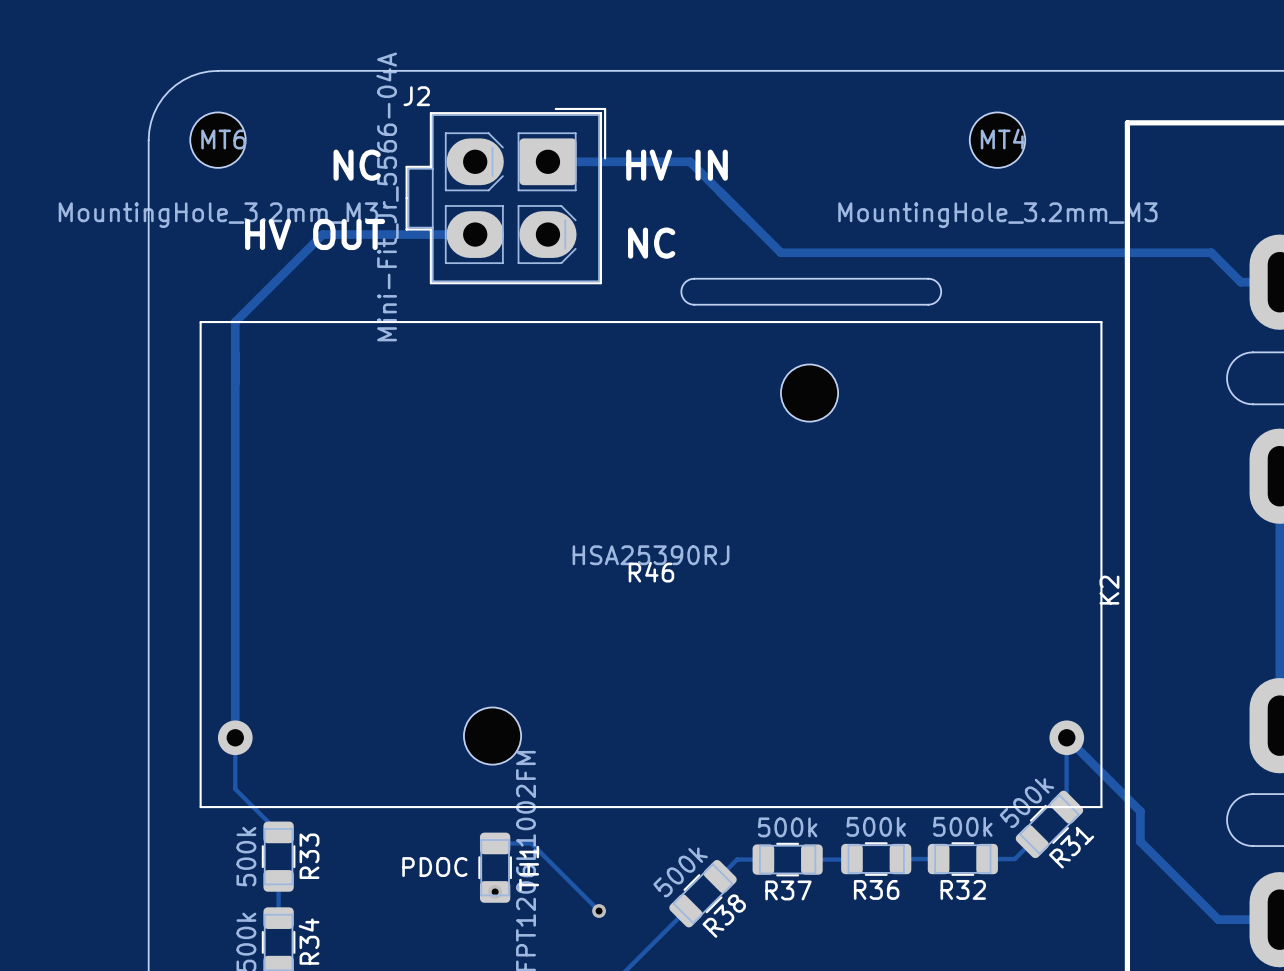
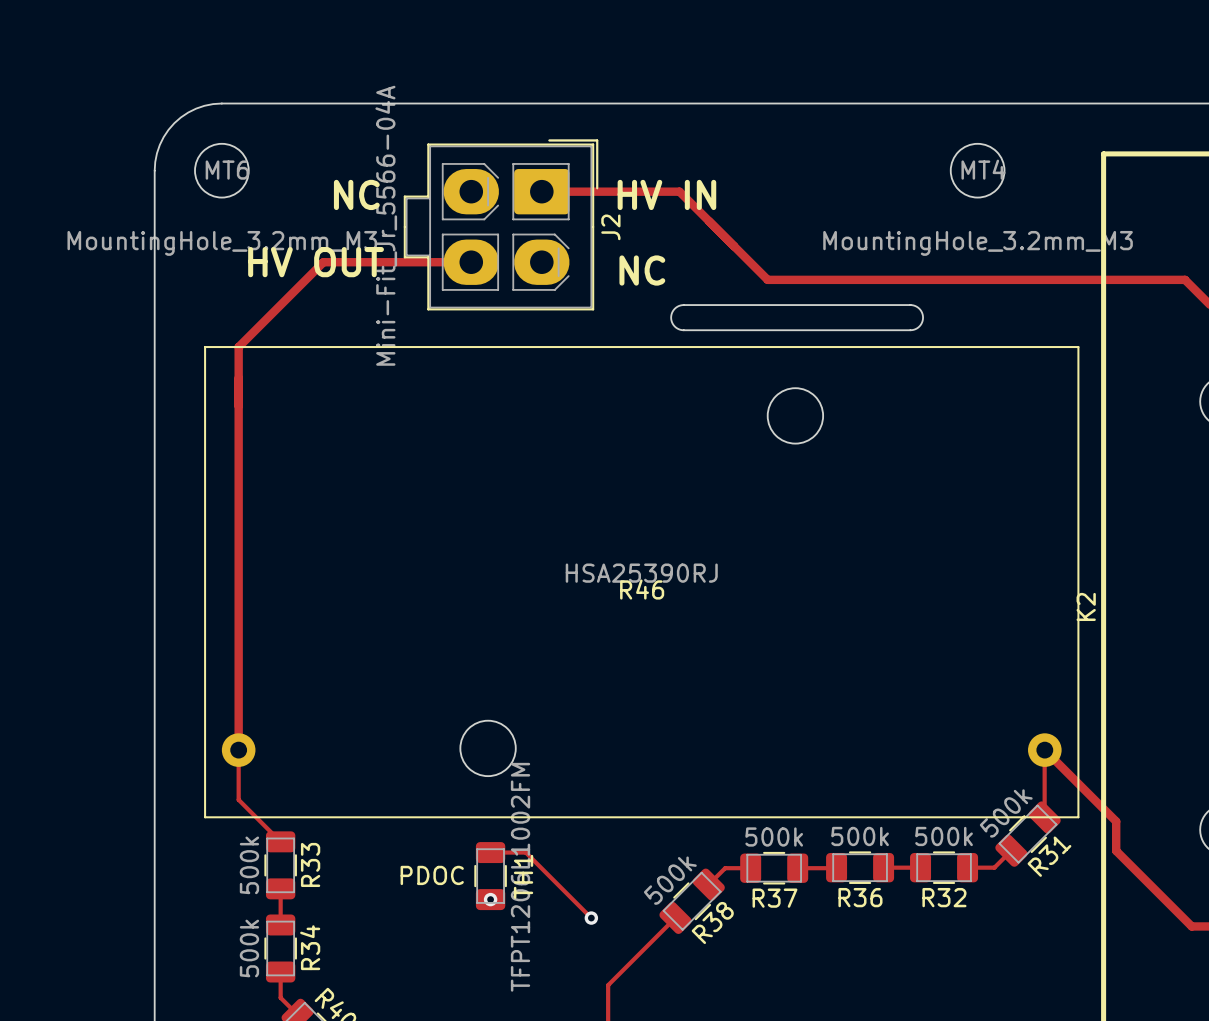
J2 name rotation: 0° (416, 96) -> 90° counterclockwise (610, 227)
J2 name position: J2 (416, 96) -> J2 (610, 227)

